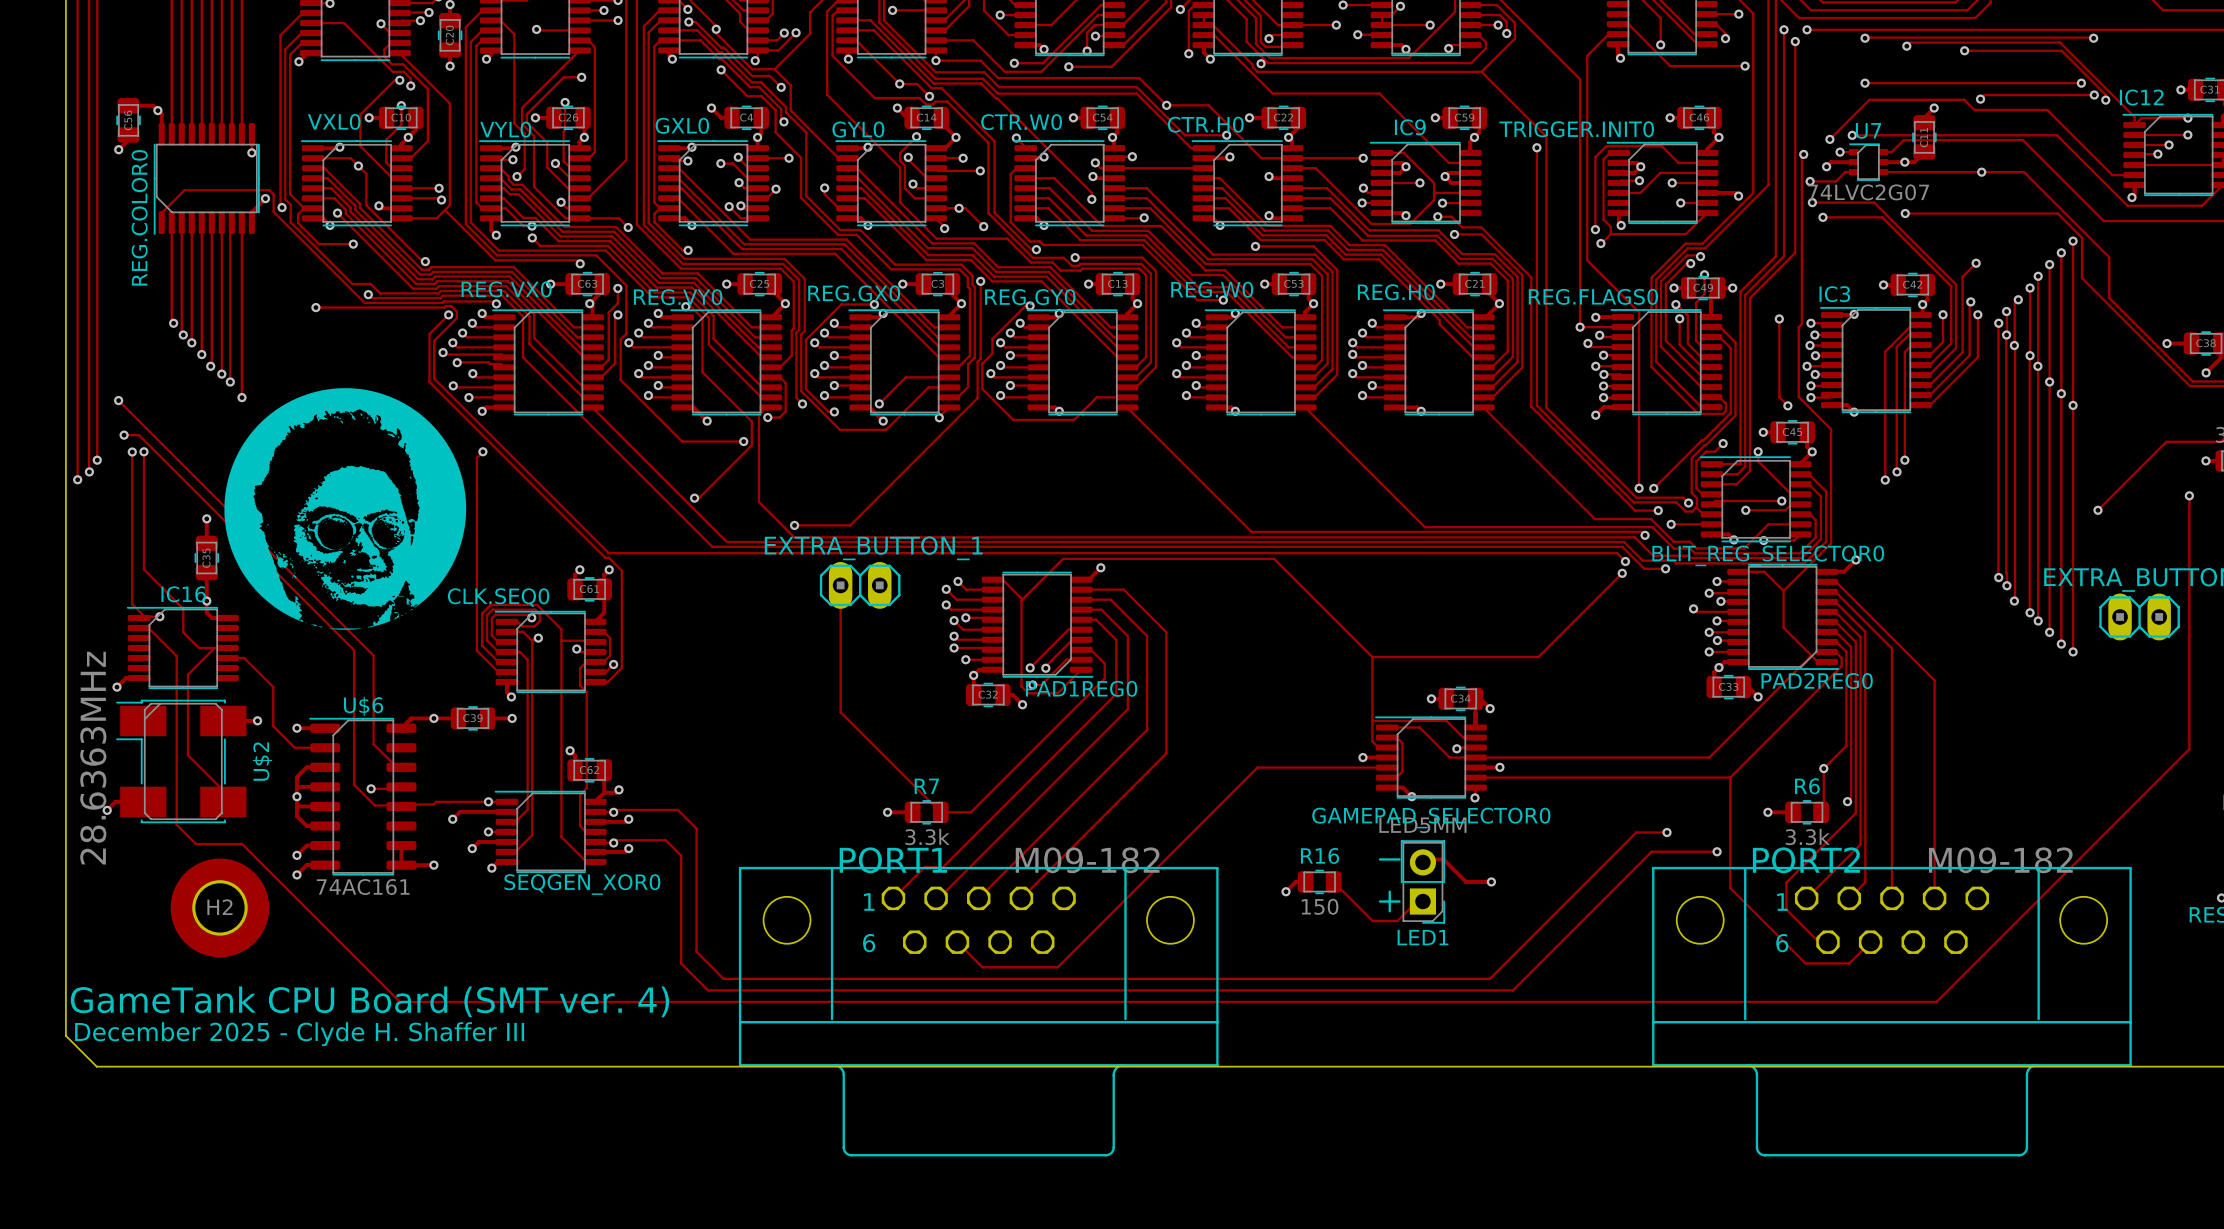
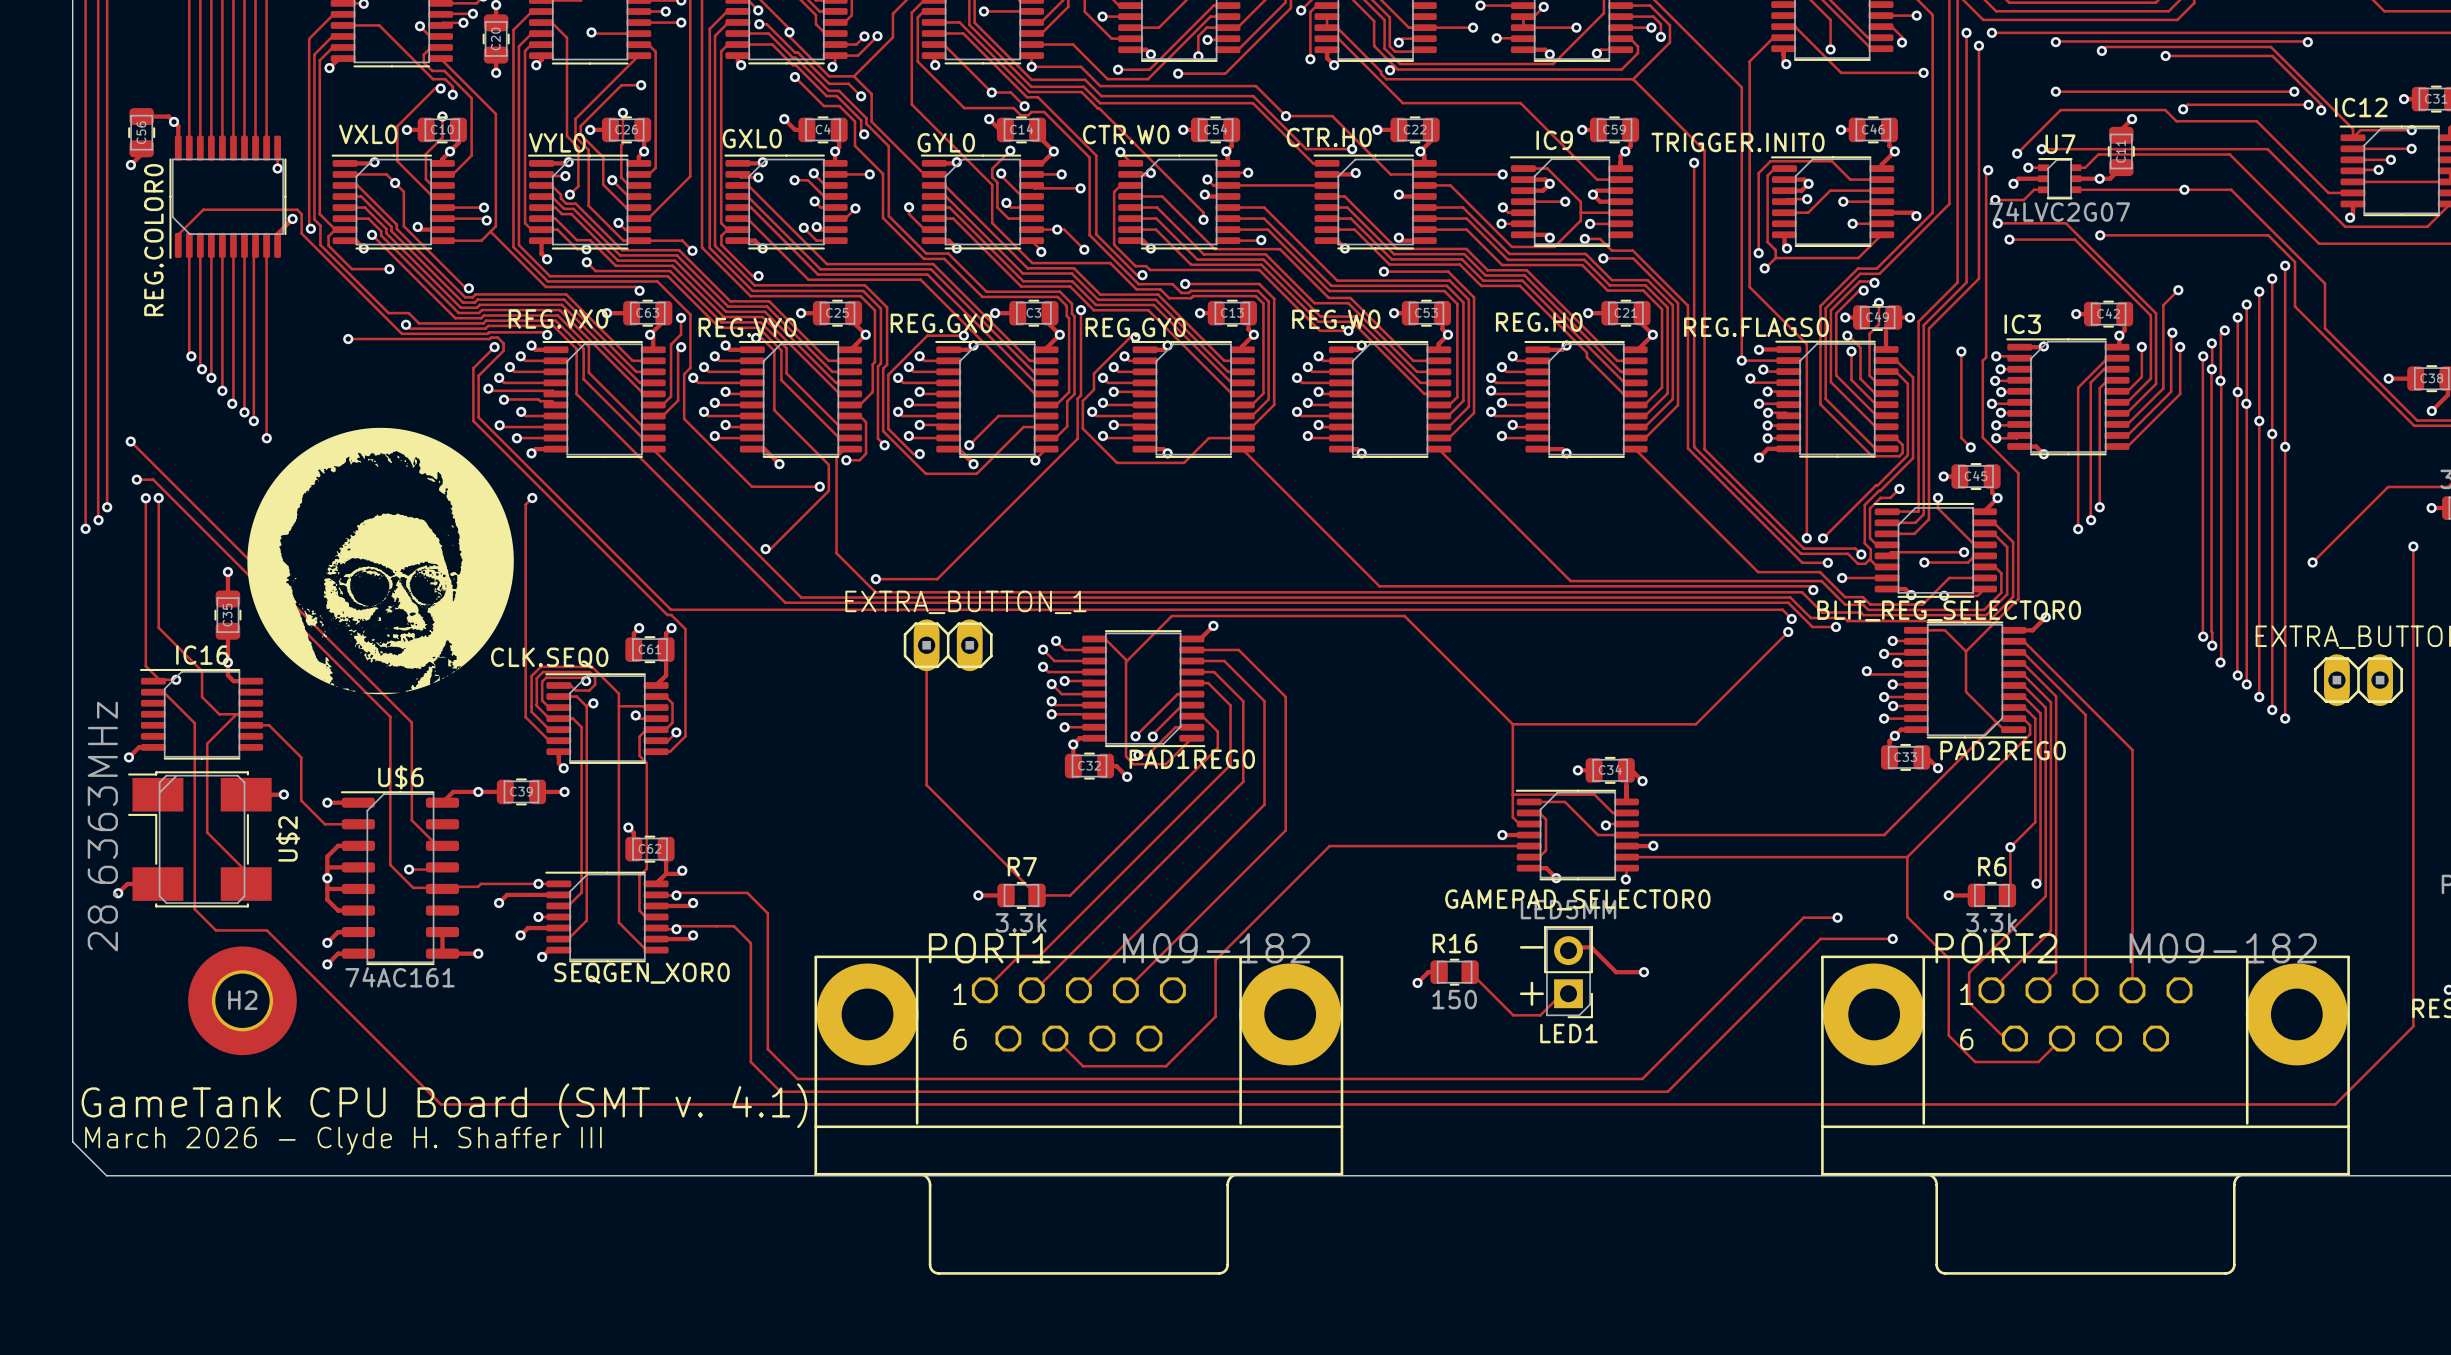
track: (2189, 749) (1936, 1001) -> (2413, 825) (2413, 1026) (2335, 1104) (2134, 1104)
track: (1257, 767) (1102, 922) -> (1386, 846) (1329, 846) (1215, 960) (1215, 1016)
track: (1730, 831) (1730, 888) (1805, 963) -> (1907, 917) (1948, 958) (1948, 1035) (1975, 1062) (1990, 1062)
PORT1 footprint: [738, 866, 1219, 1157] -> [814, 955, 1344, 1275]
PORT2 footprint: [1652, 866, 2132, 1157] -> [1821, 955, 2350, 1275]
text: GameTank CPU Board (SMT ver. 4) (369, 1001) -> GameTank CPU Board (SMT v. 4.1) (444, 1105)
text: December 2025 - Clyde H. Shaffer III (299, 1034) -> March 2026 - Clyde H. Shaffer III (343, 1140)

